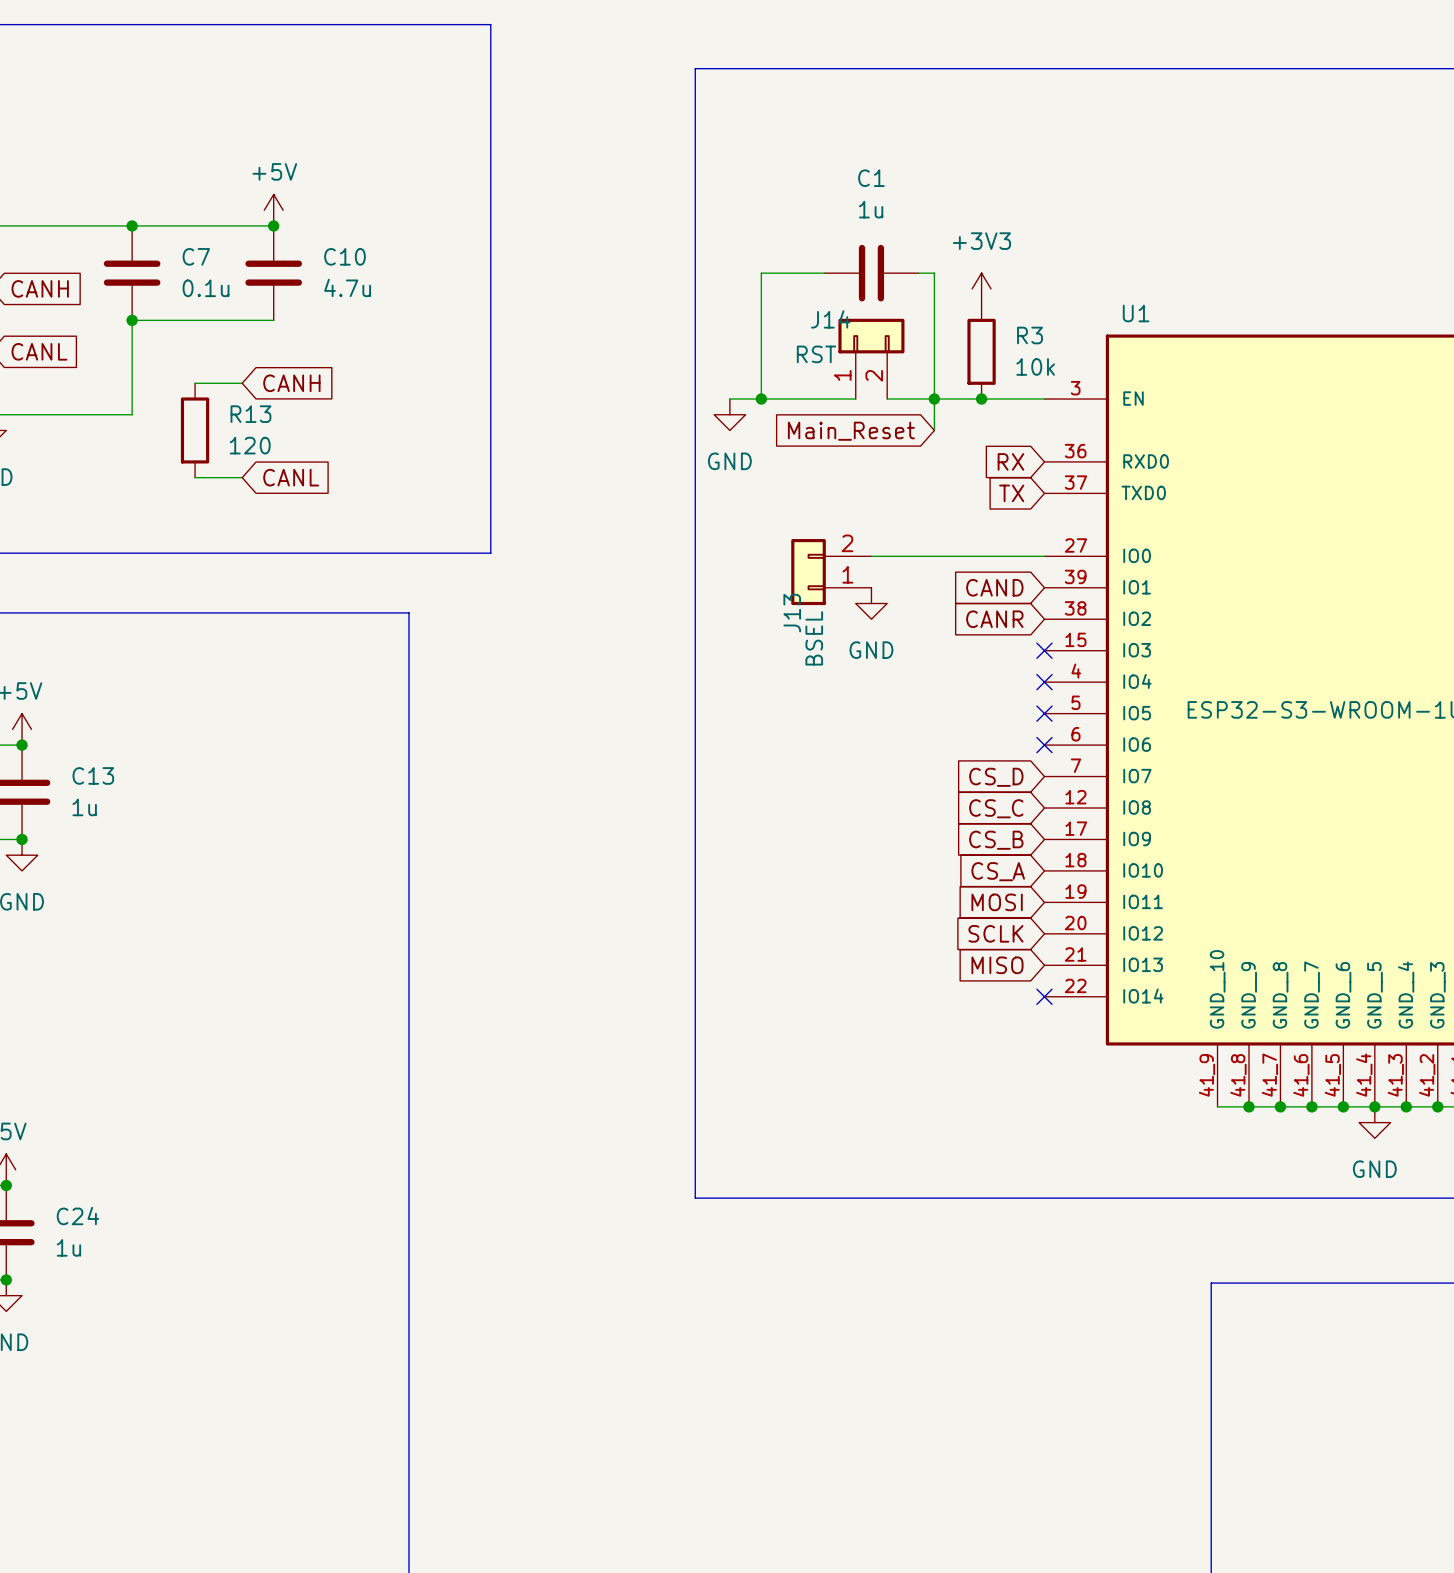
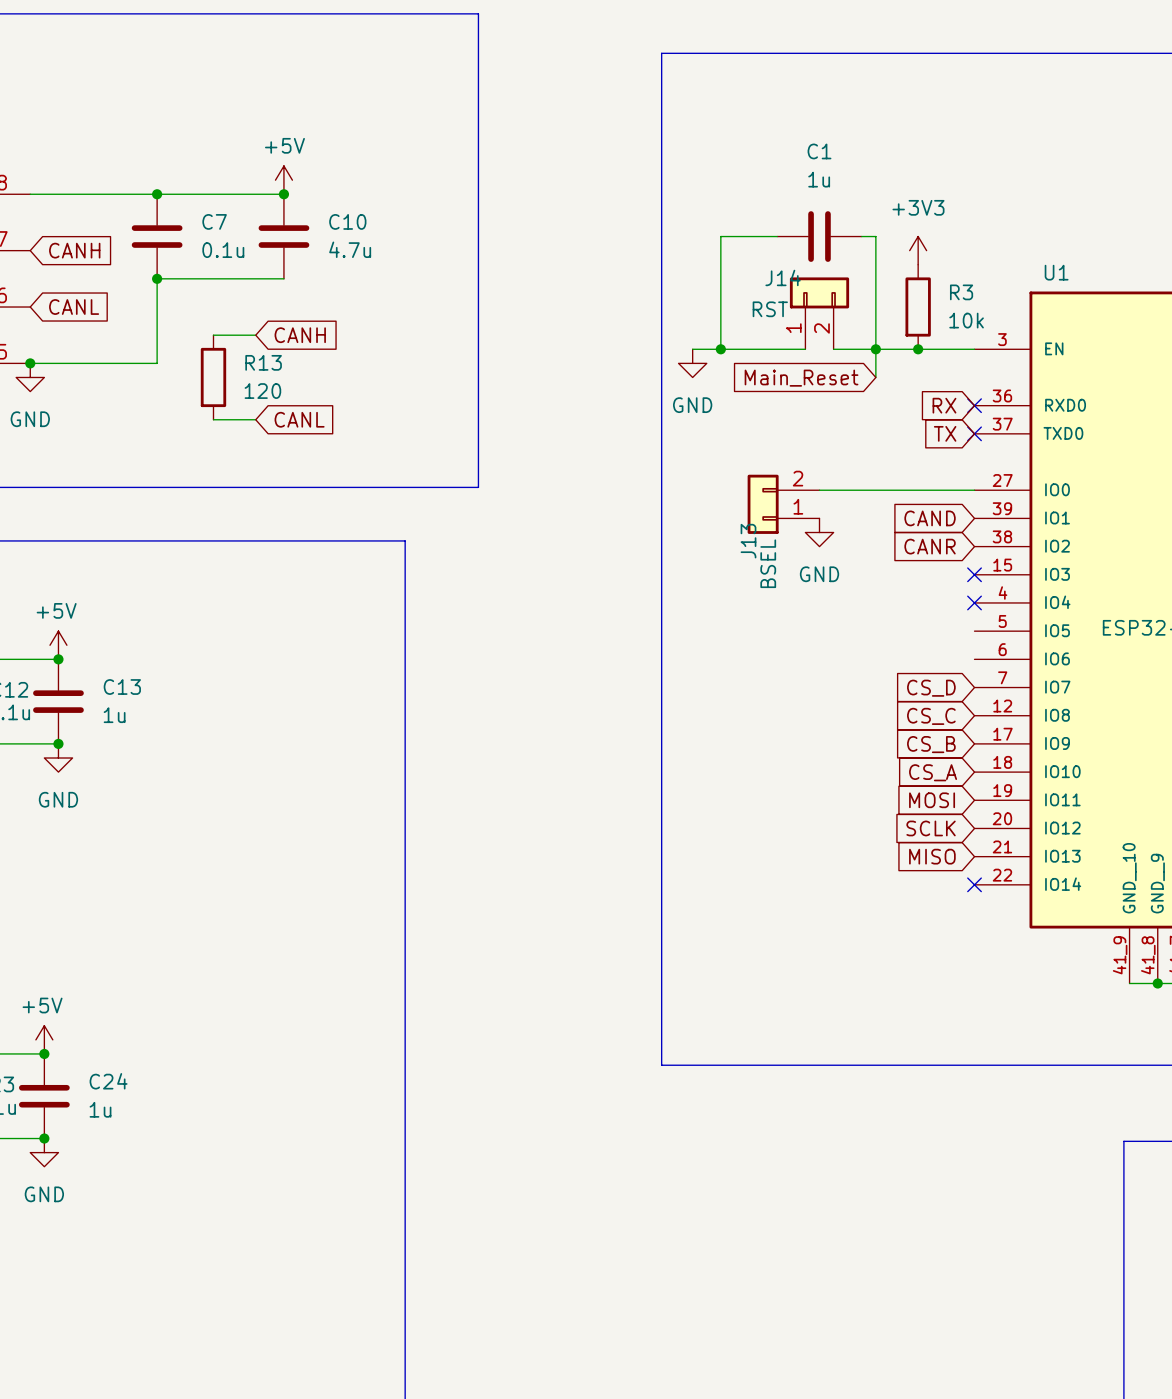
no-connect mark: none -> (974, 405)
no-connect mark: none -> (974, 433)
no-connect mark: (1044, 713) -> none
no-connect mark: (1044, 745) -> none

